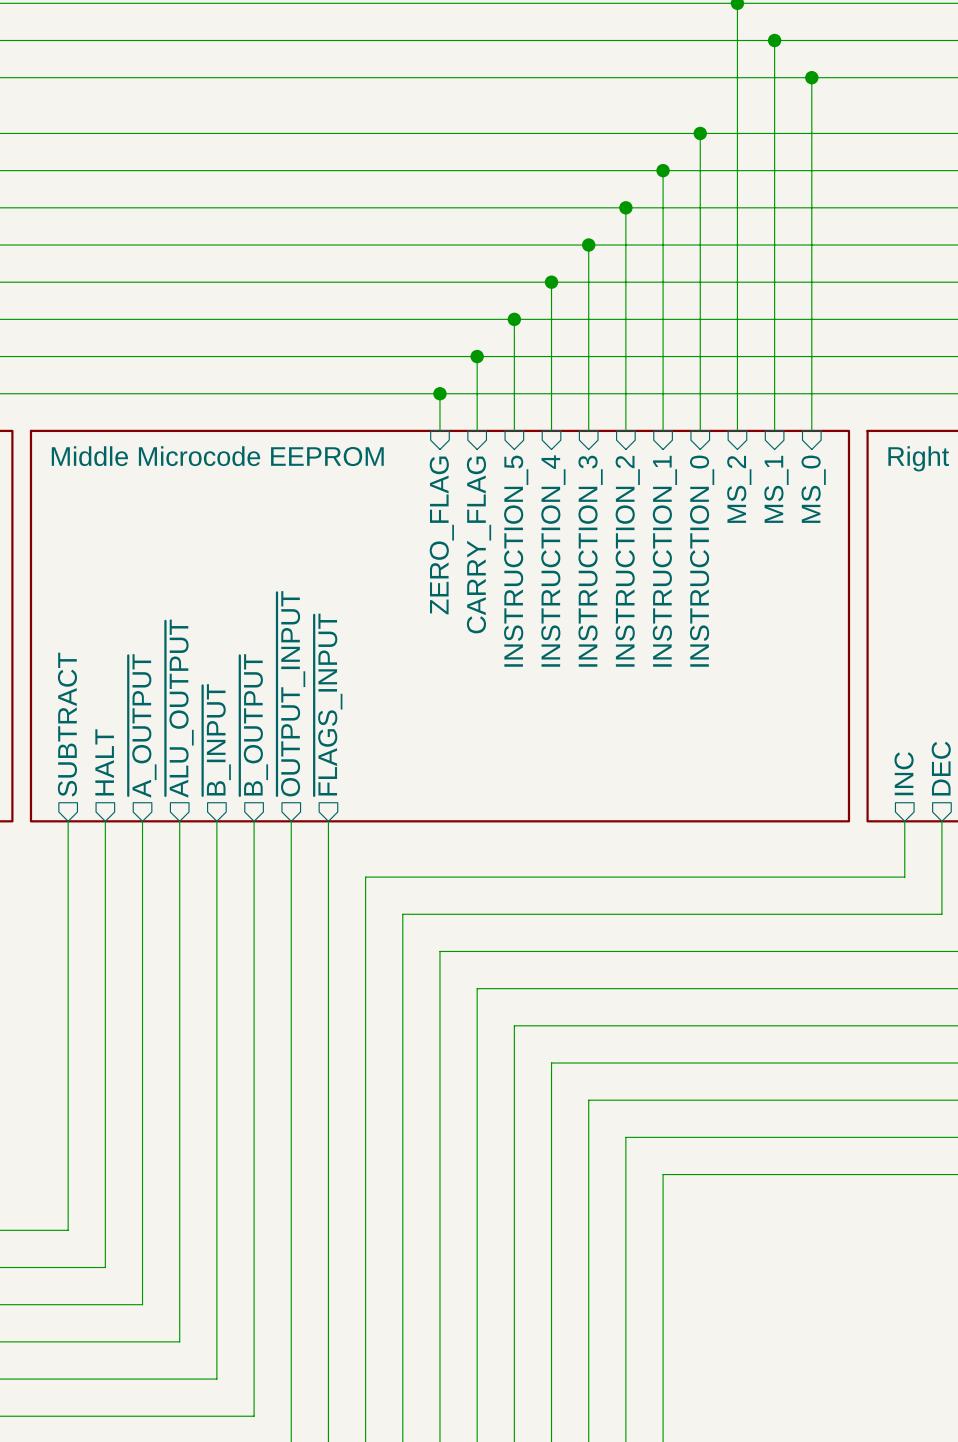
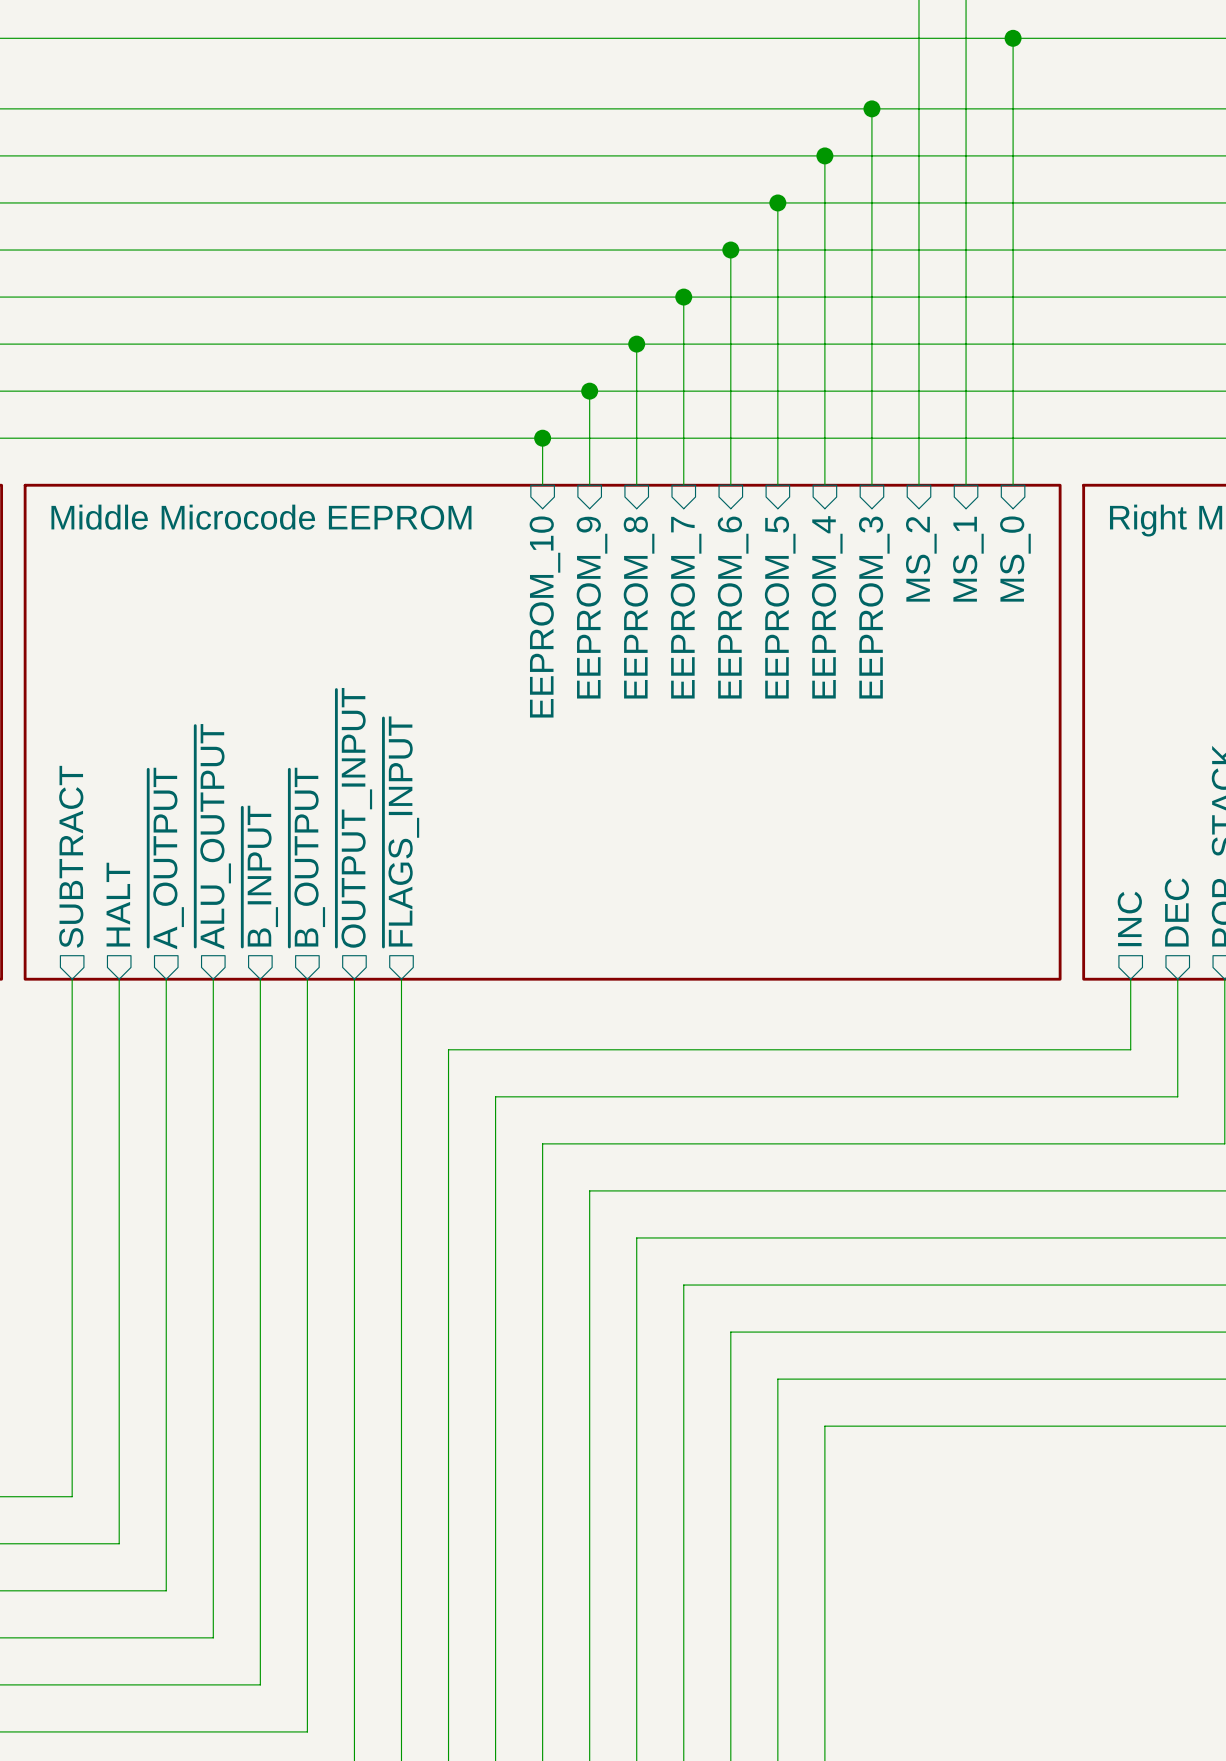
sheet pin: ZERO_FLAG (441, 535) -> EEPROM_10 (544, 617)
sheet pin: CARRY_FLAG (479, 544) -> EEPROM_9 (592, 607)
sheet pin: INSTRUCTION_5 (516, 561) -> EEPROM_8 (639, 607)
sheet pin: INSTRUCTION_4 (553, 561) -> EEPROM_7 (686, 607)
sheet pin: INSTRUCTION_3 (590, 561) -> EEPROM_6 (733, 607)
sheet pin: INSTRUCTION_2 (627, 561) -> EEPROM_5 (780, 607)
sheet pin: INSTRUCTION_1 (664, 561) -> EEPROM_4 (827, 607)
sheet pin: INSTRUCTION_0 (702, 561) -> EEPROM_3 (874, 607)

